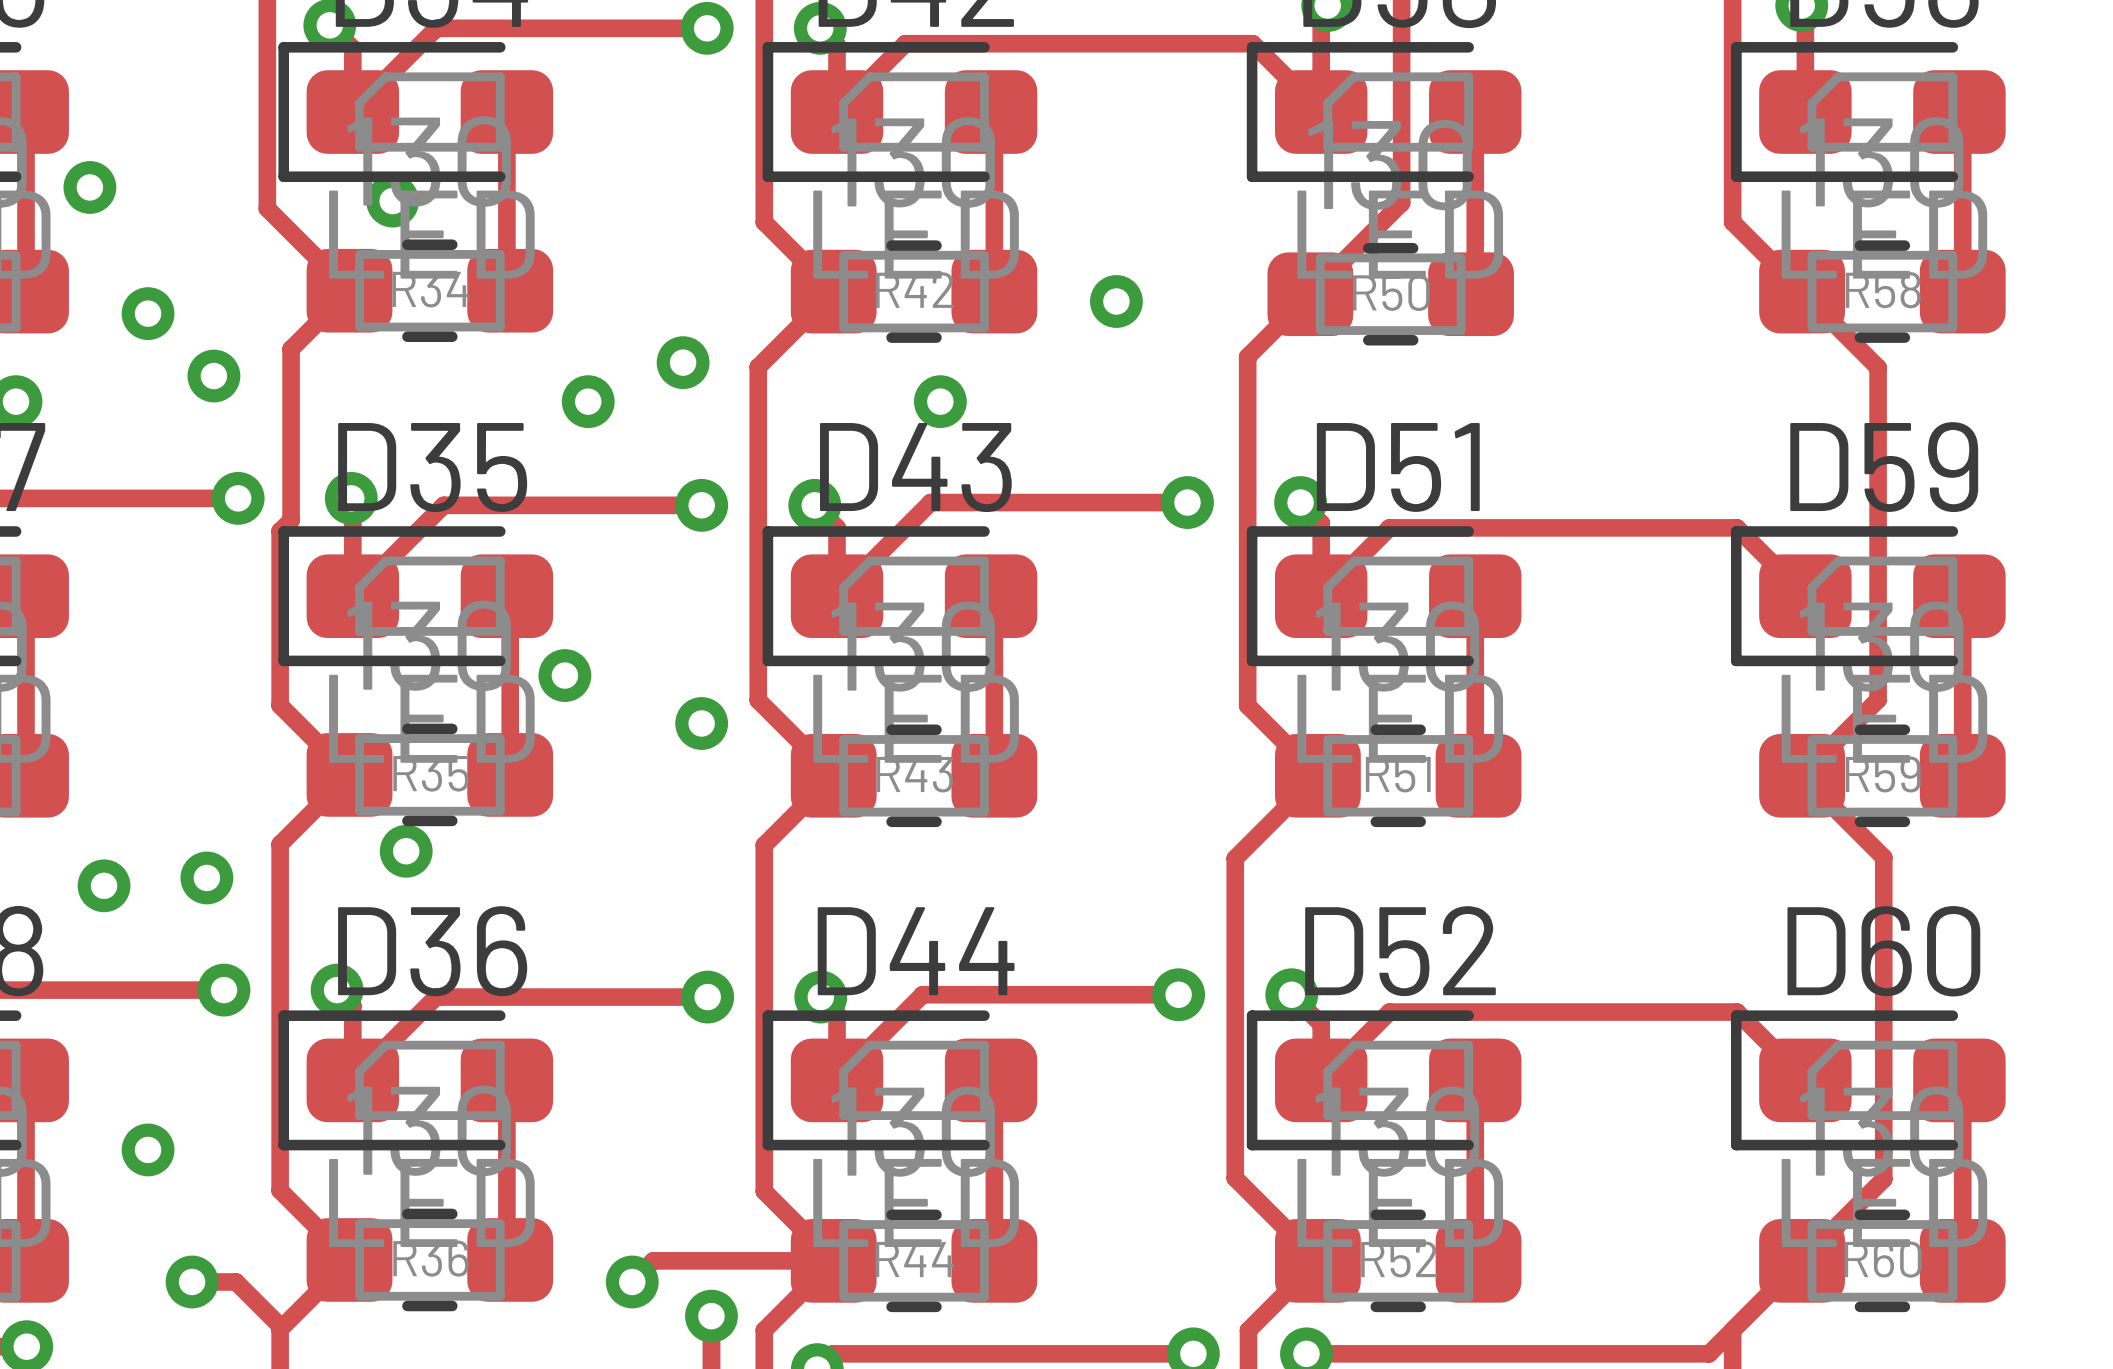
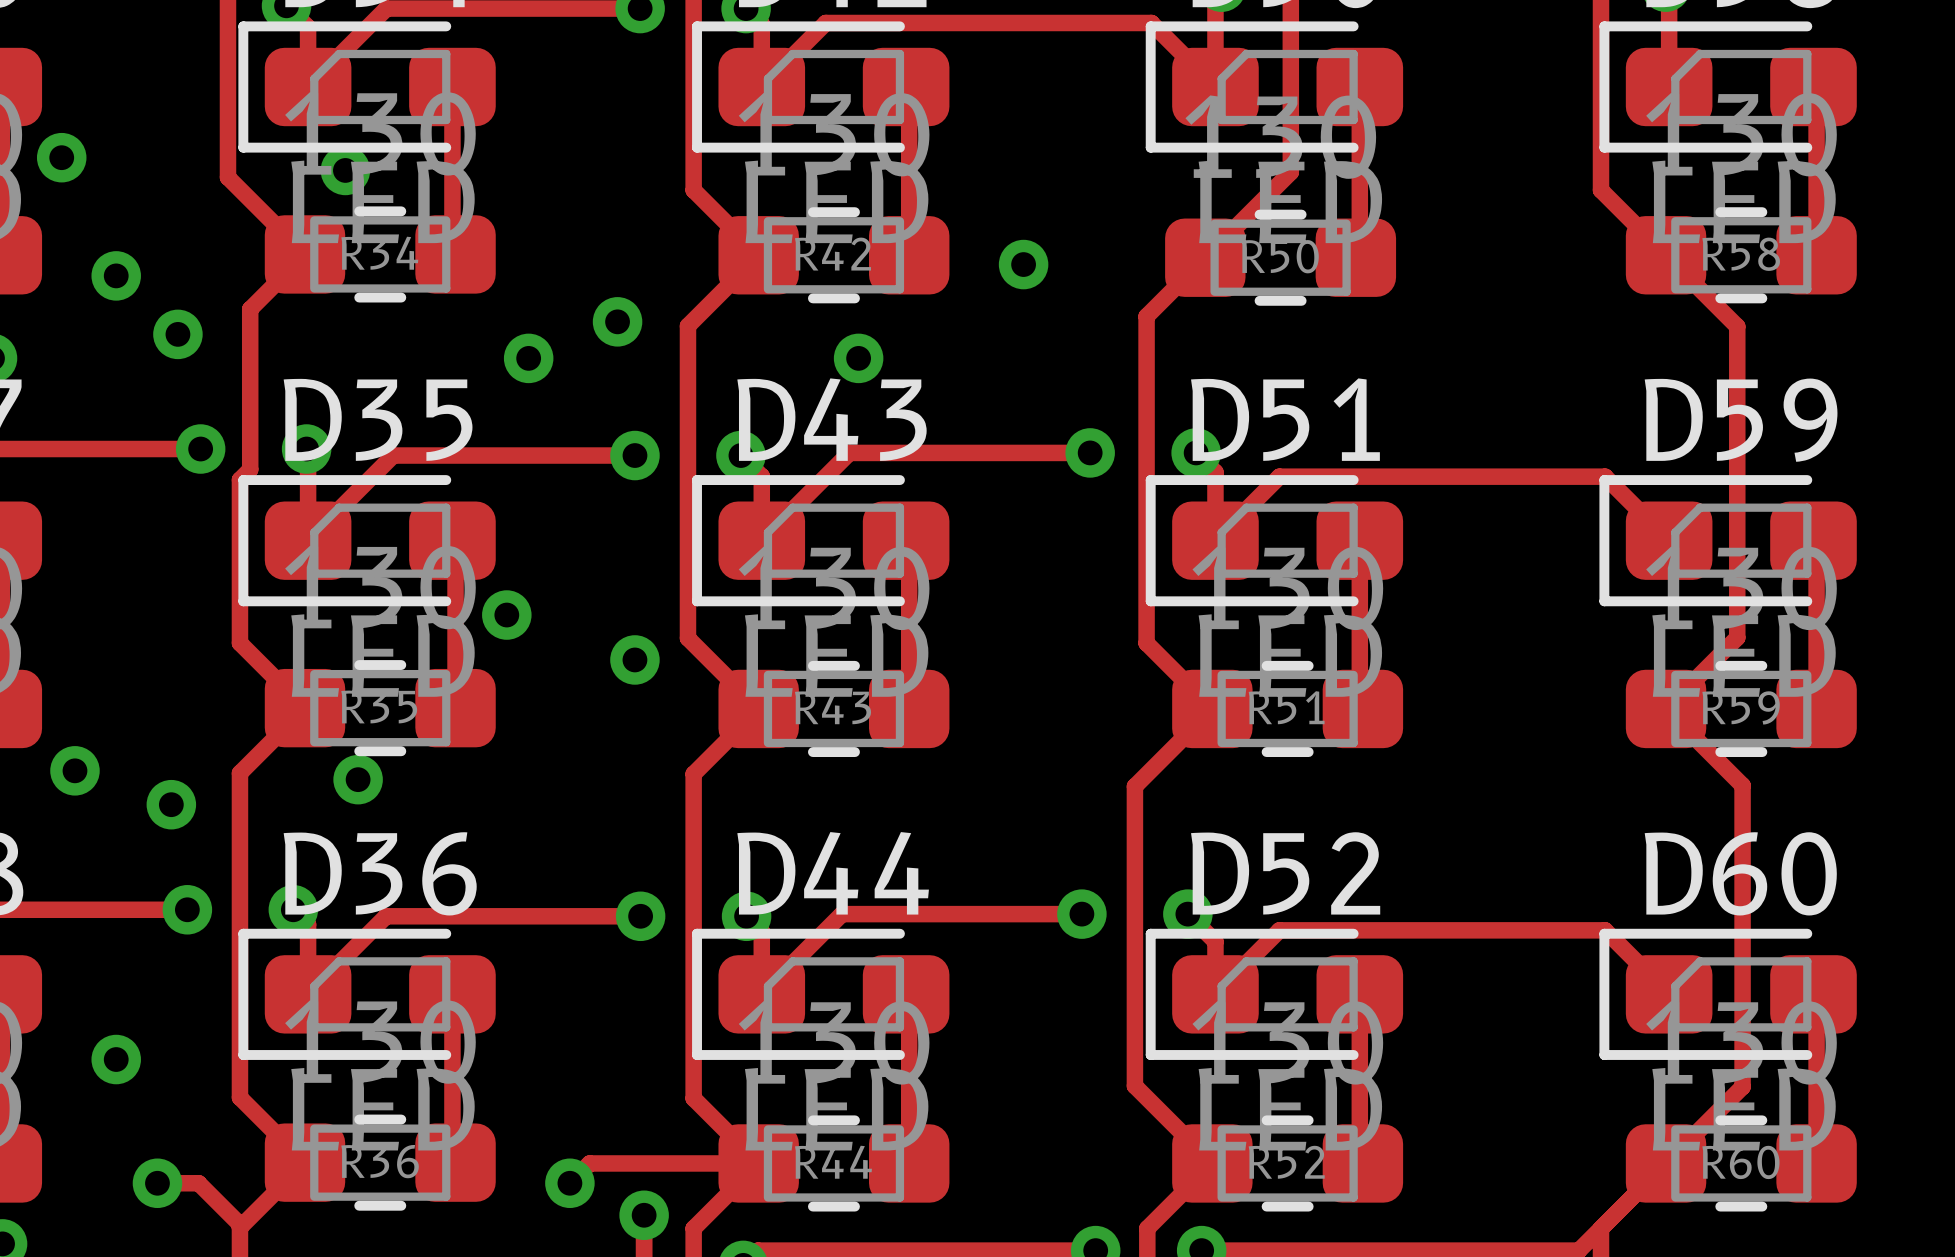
via position: (104, 885) -> (74, 770)

